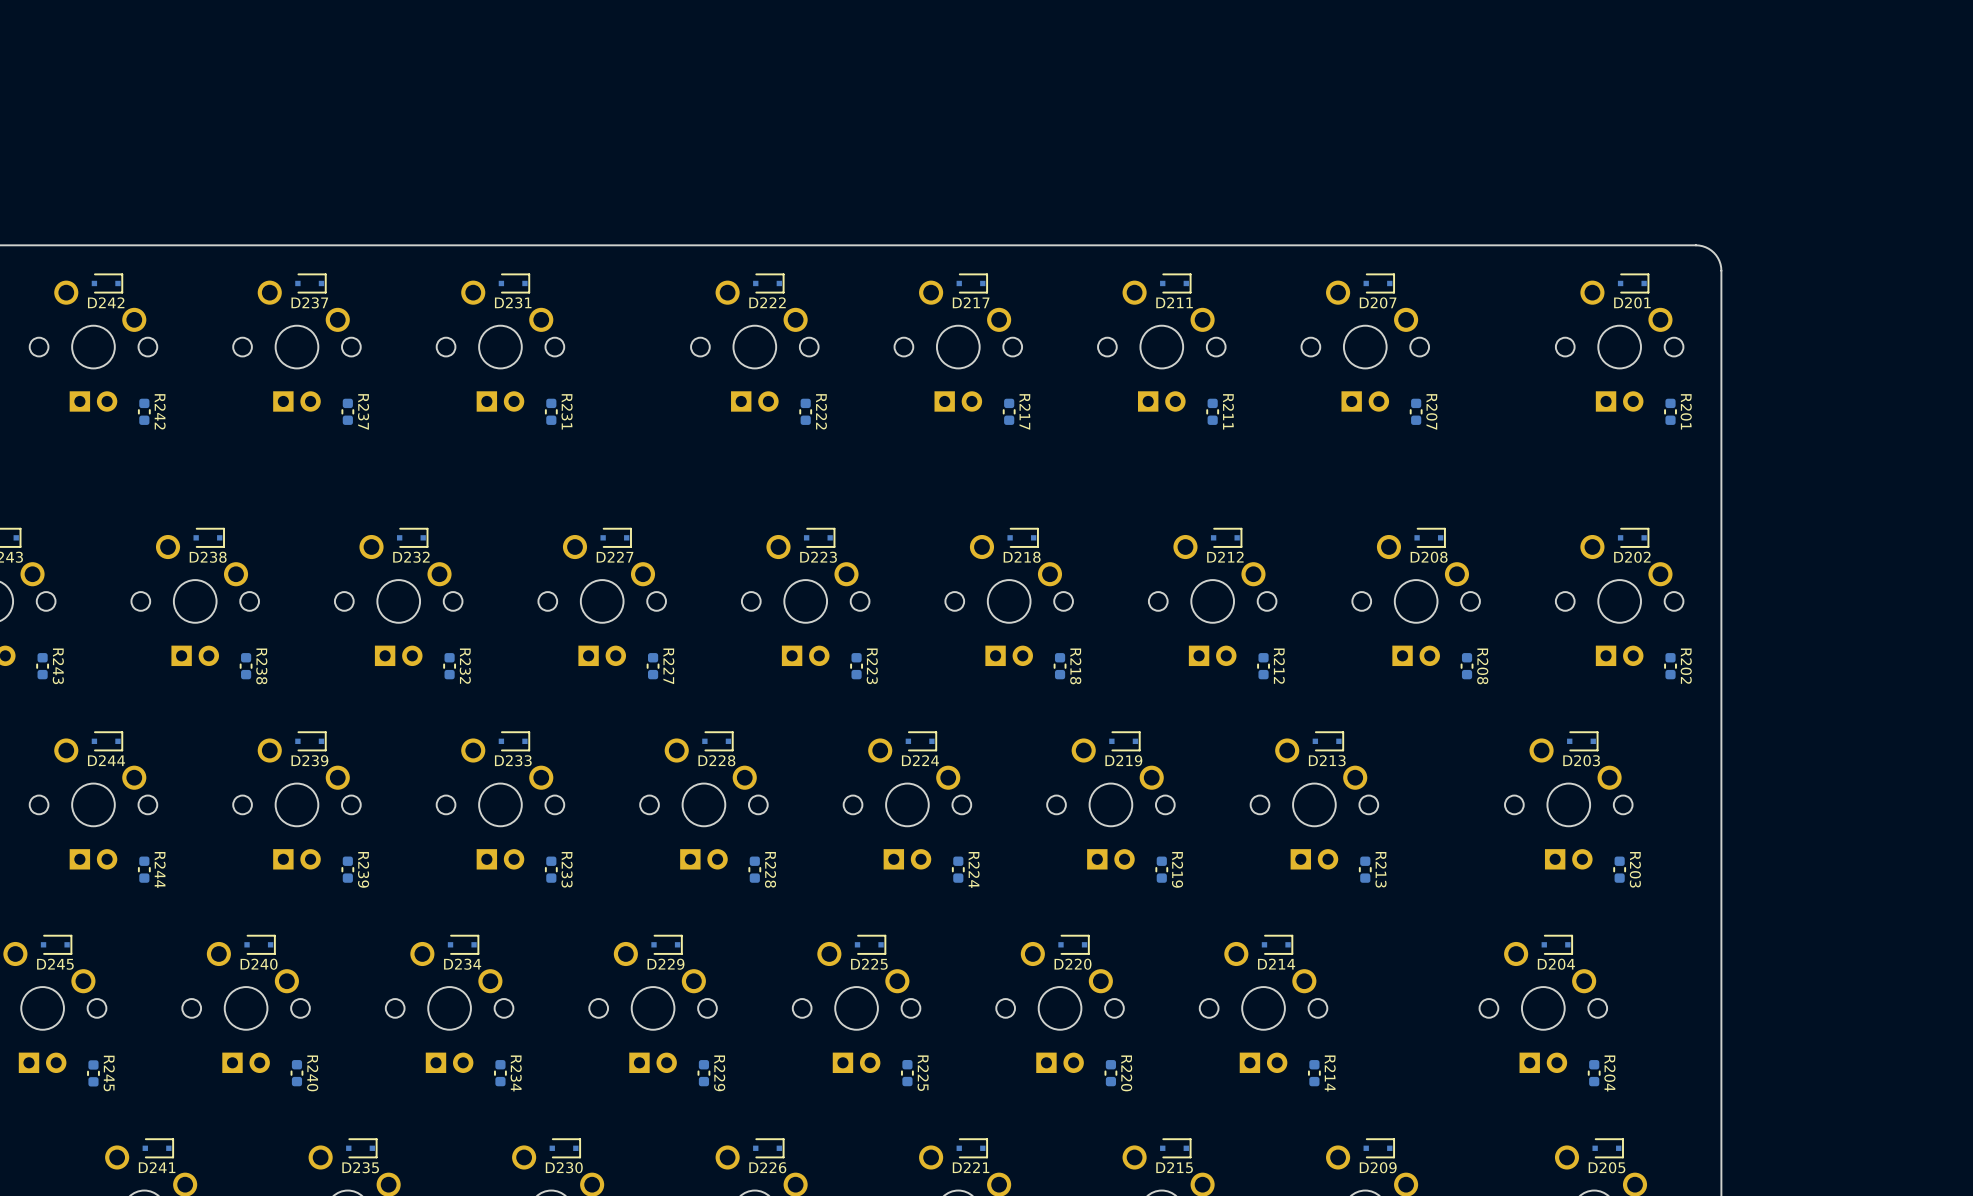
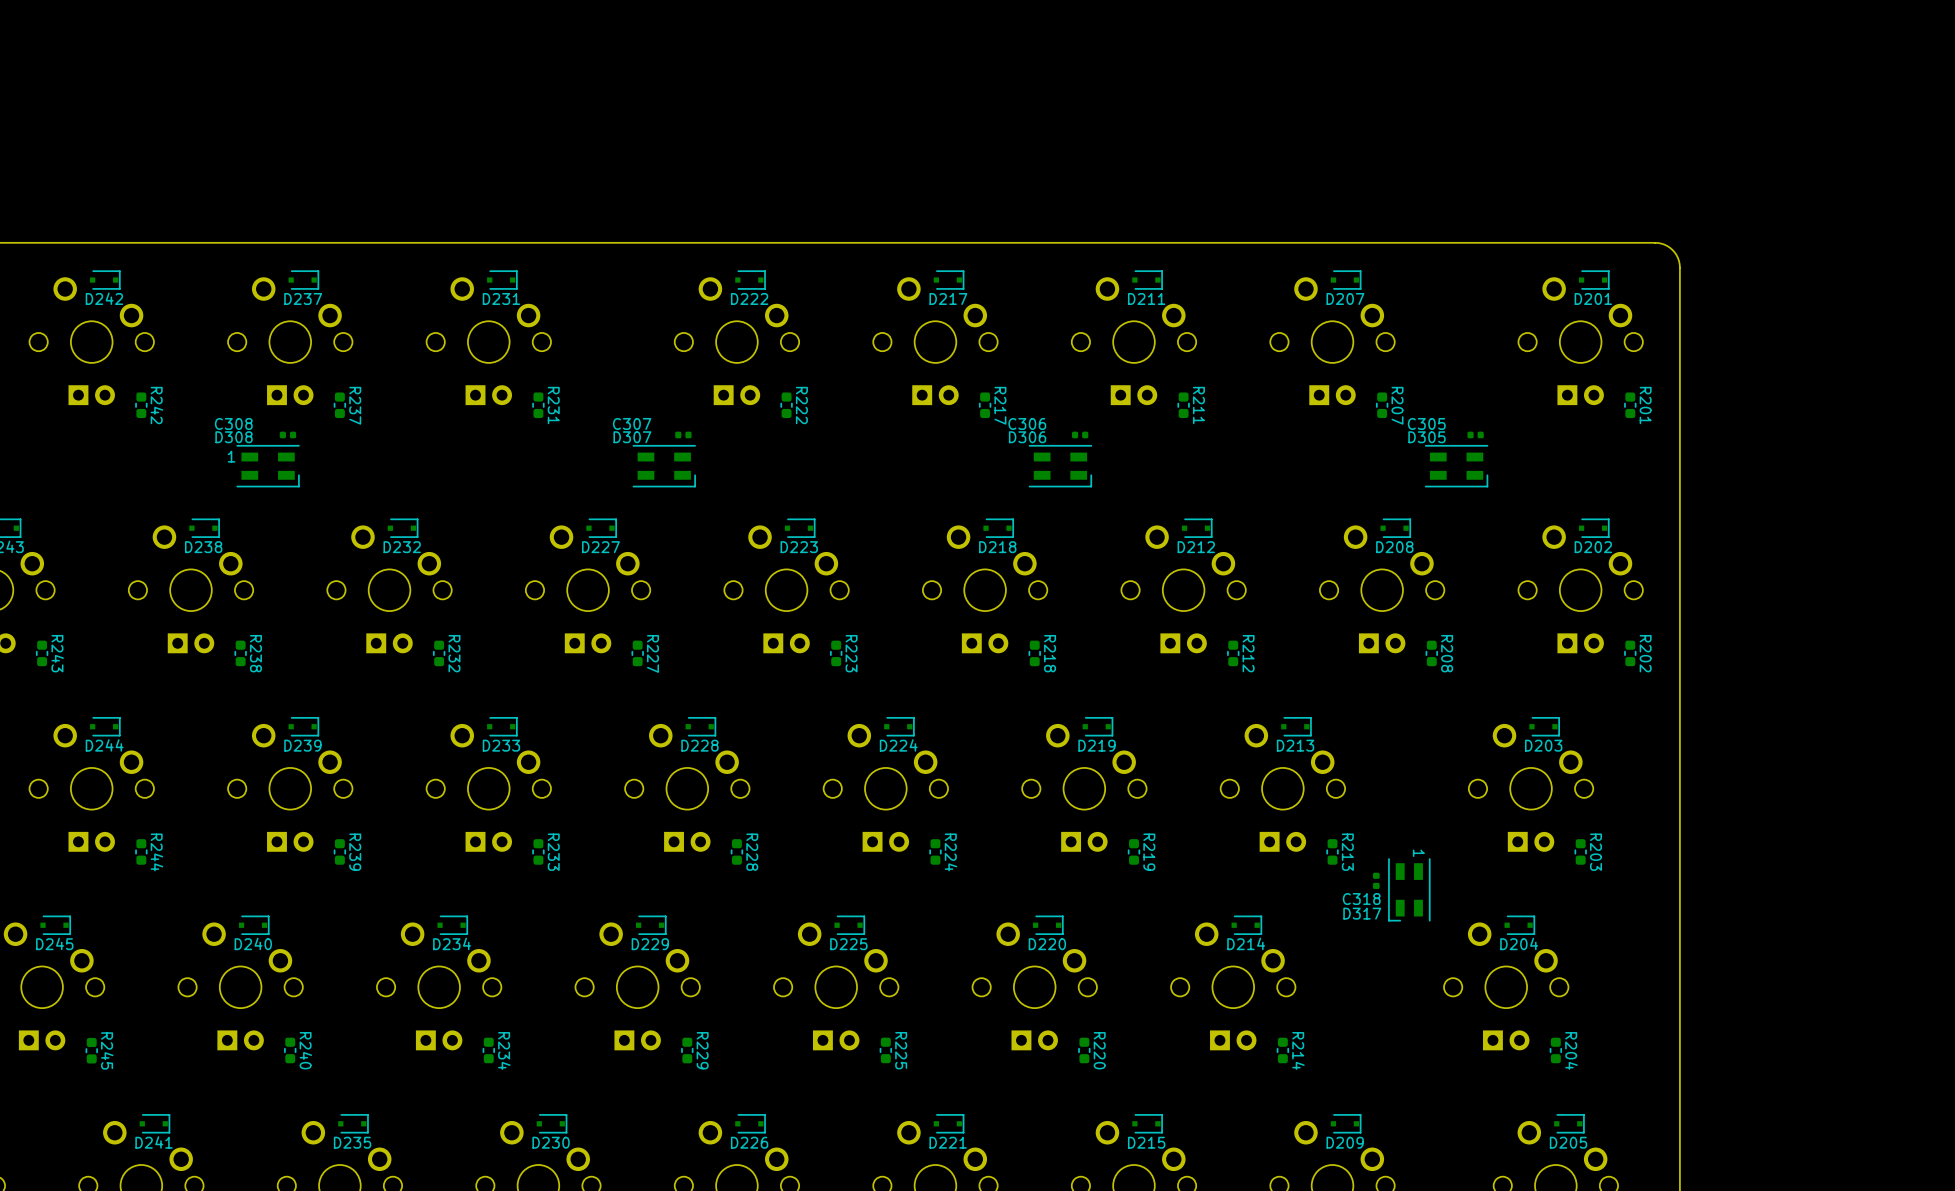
C308: none -> (287, 434)
C307: none -> (683, 434)
C306: none -> (1080, 434)
C305: none -> (1475, 434)
D308: none -> (268, 466)
D307: none -> (664, 466)
D306: none -> (1060, 466)
D305: none -> (1456, 466)
C318: none -> (1376, 880)
D317: none -> (1409, 889)

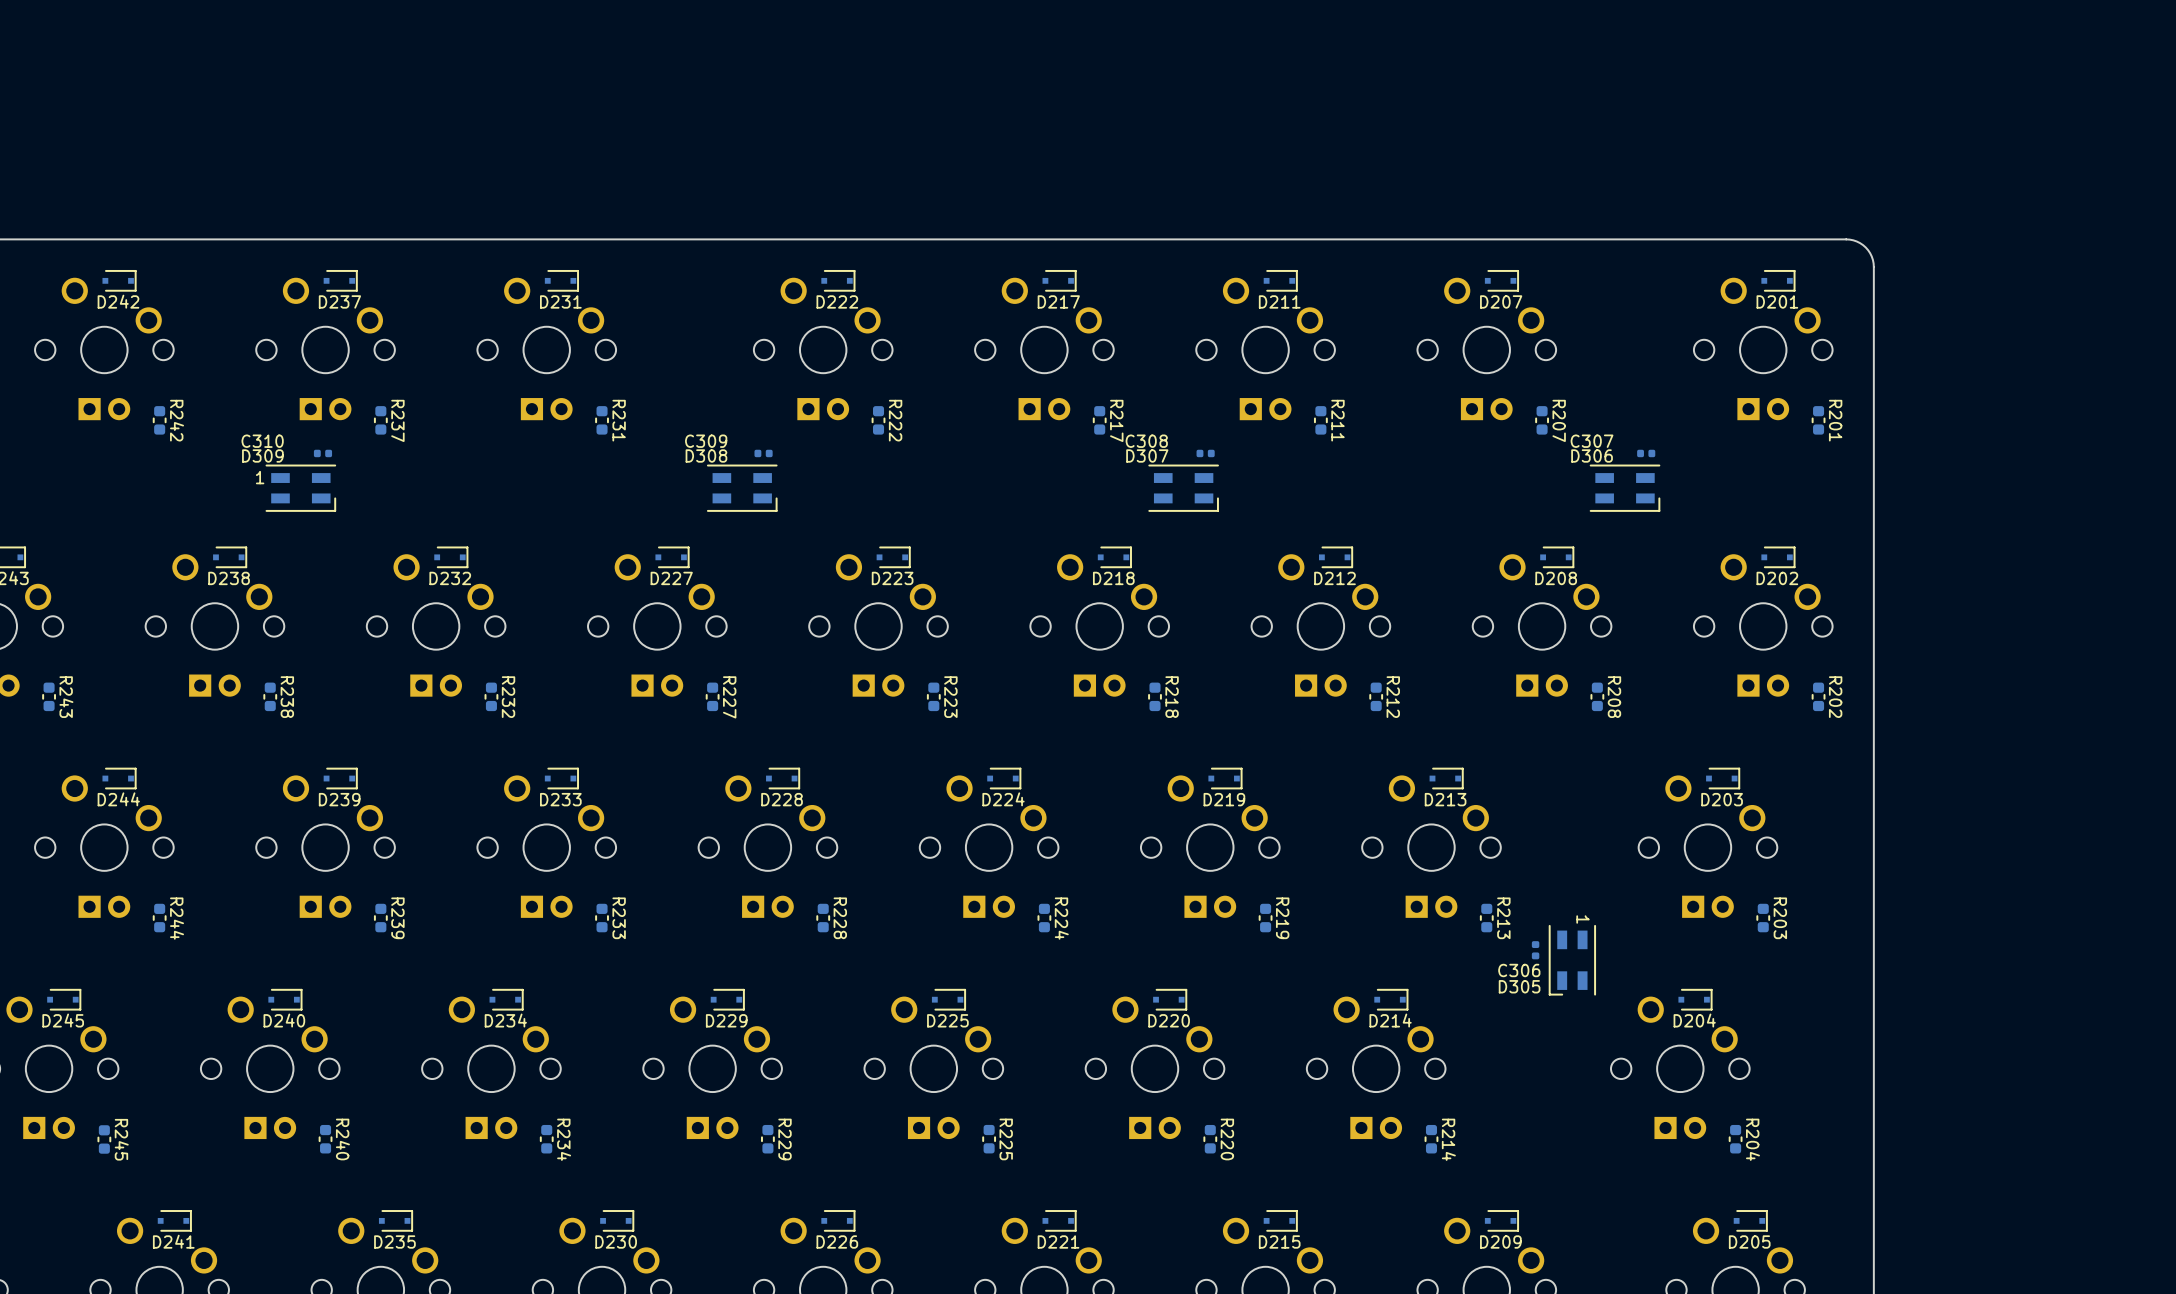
C308 name: C308 (233, 423) -> C310 (262, 441)
C307 name: C307 (632, 423) -> C309 (706, 441)
C306 name: C306 (1027, 423) -> C308 (1146, 441)
C305 name: C305 (1426, 423) -> C307 (1592, 441)
D308 name: D308 (234, 437) -> D309 (262, 455)
D307 name: D307 (632, 437) -> D308 (706, 455)
D306 name: D306 (1027, 437) -> D307 (1147, 455)
D305 name: D305 (1426, 437) -> D306 (1592, 455)
C318 name: C318 (1361, 899) -> C306 (1519, 970)
D317 name: D317 (1362, 913) -> D305 (1519, 986)

